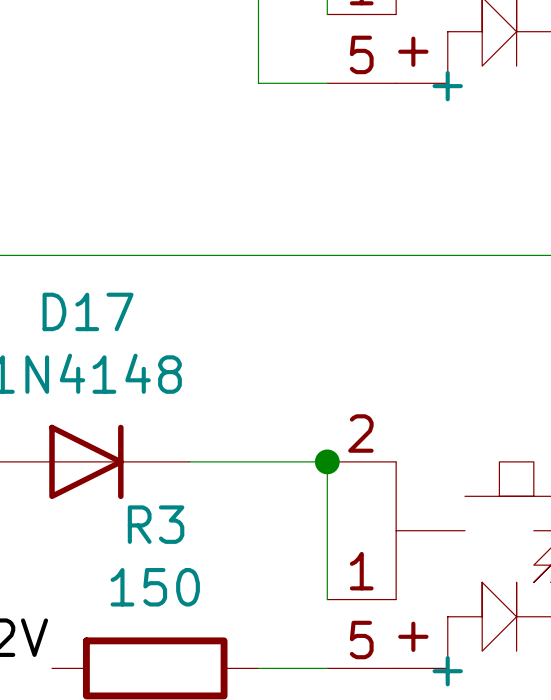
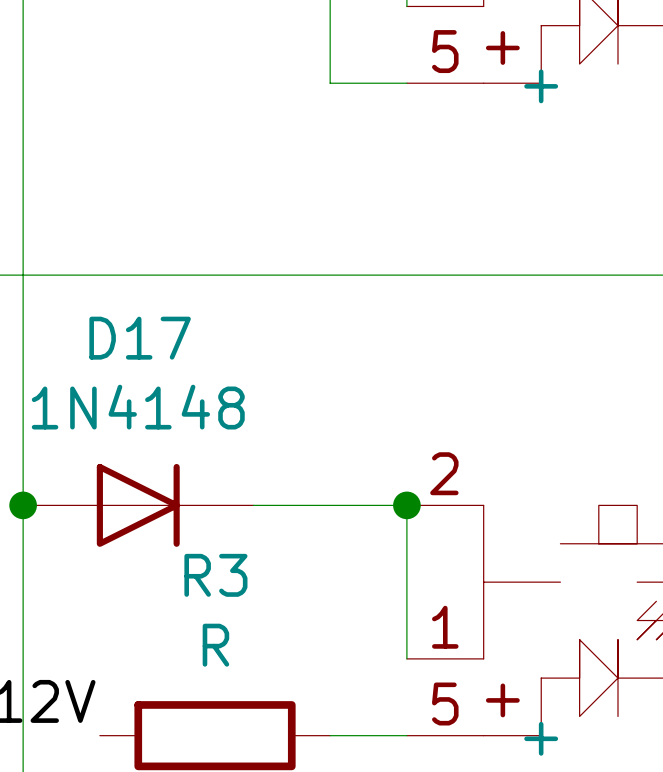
R3 value: 150 (155, 587) -> R (215, 645)

